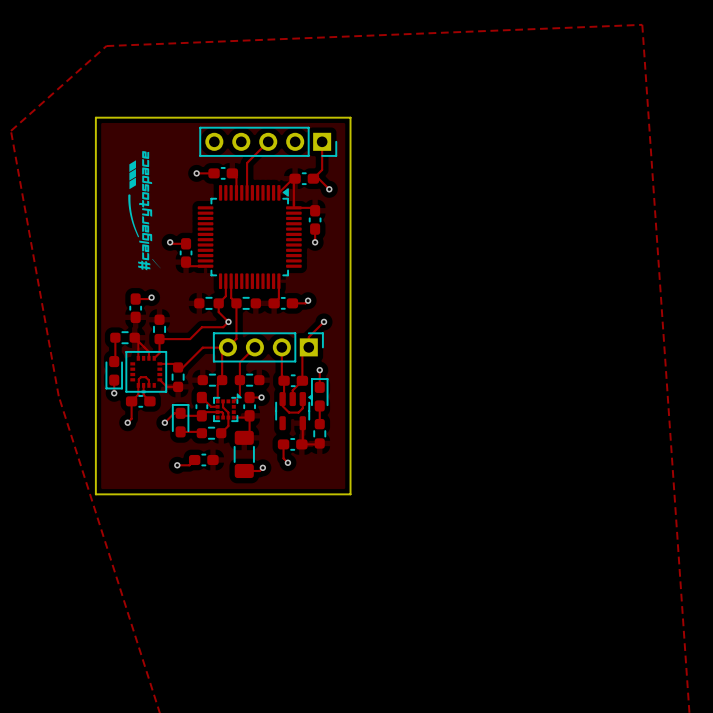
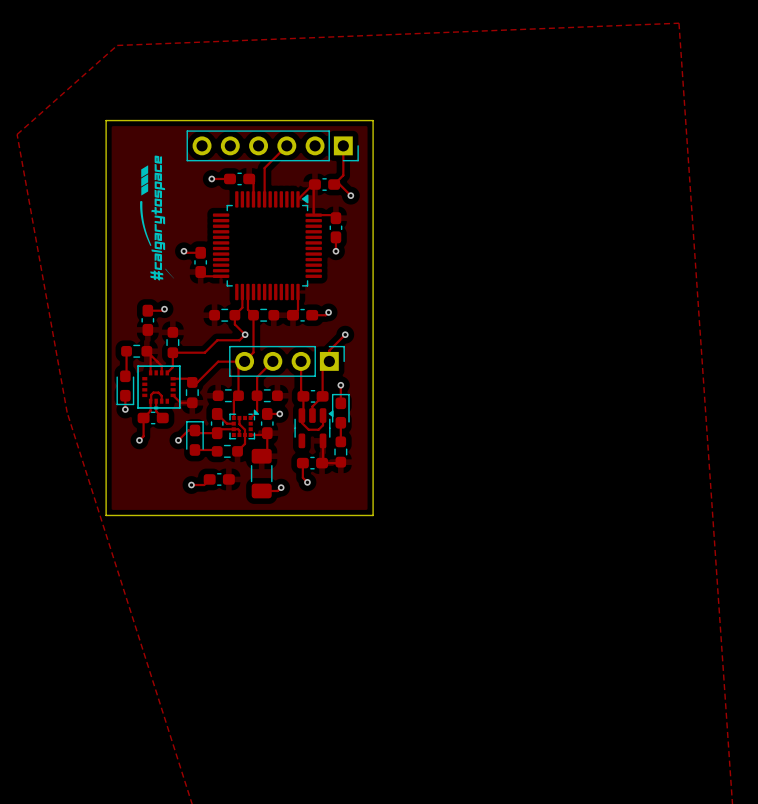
part: none -> (272, 145)
part: (268, 141) -> none

